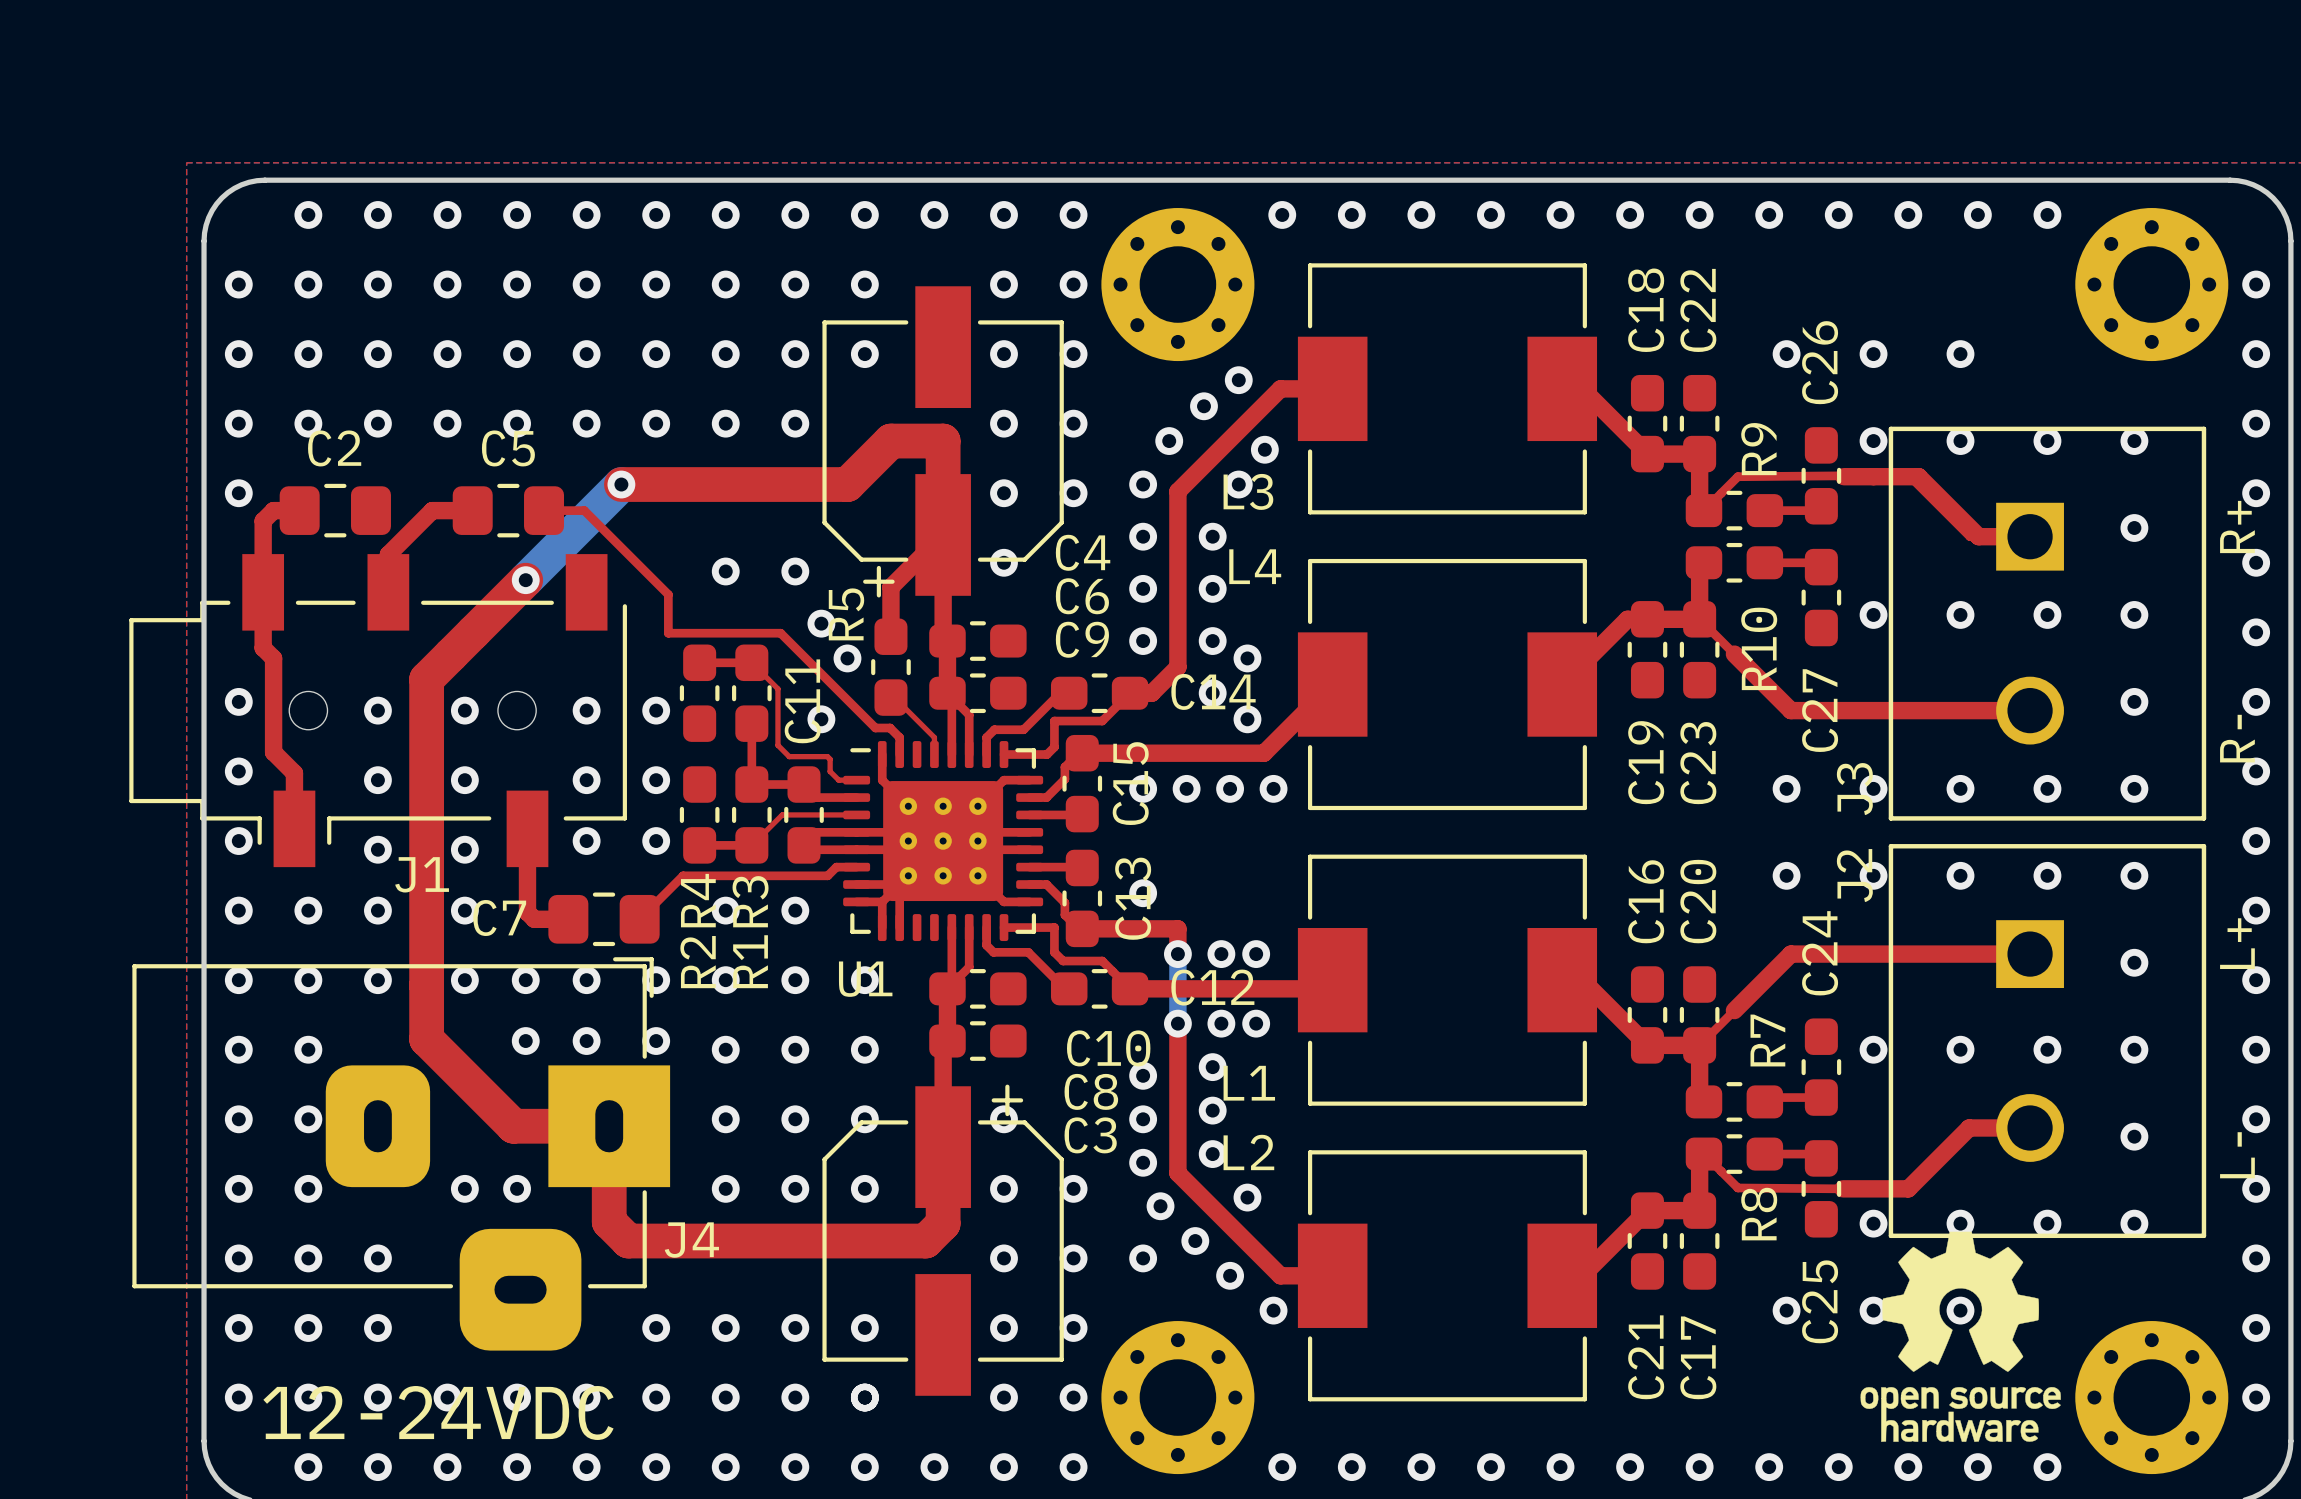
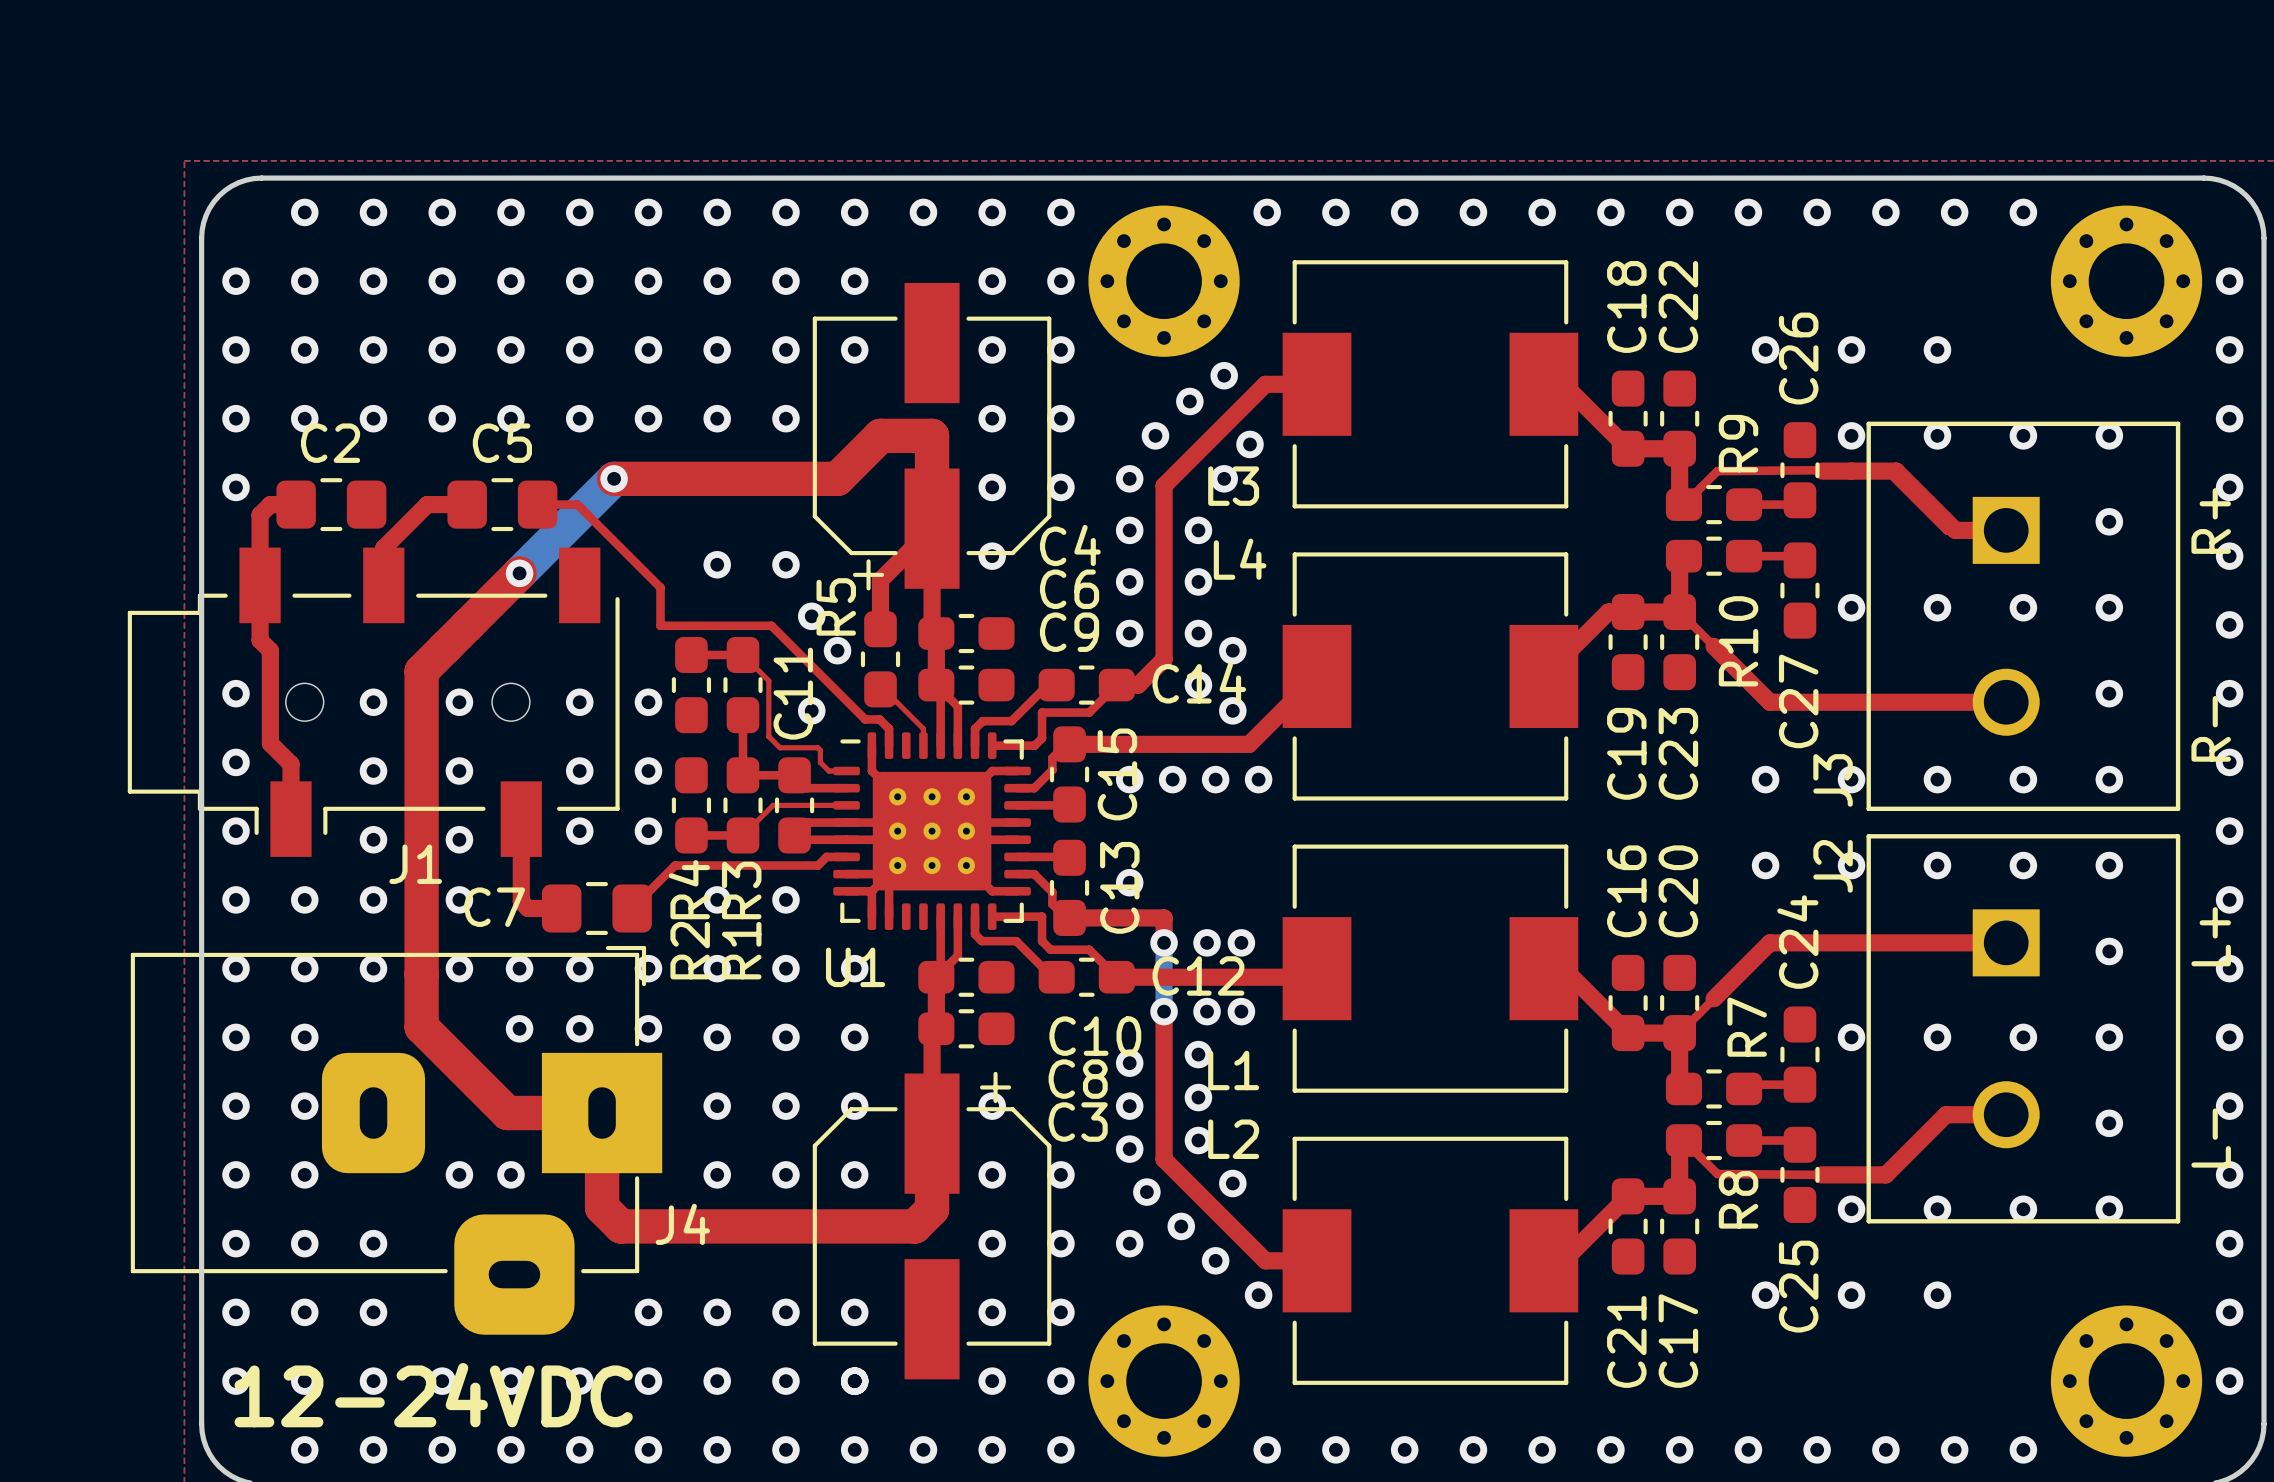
drawing: [1860, 1231, 2061, 1442] -> none

